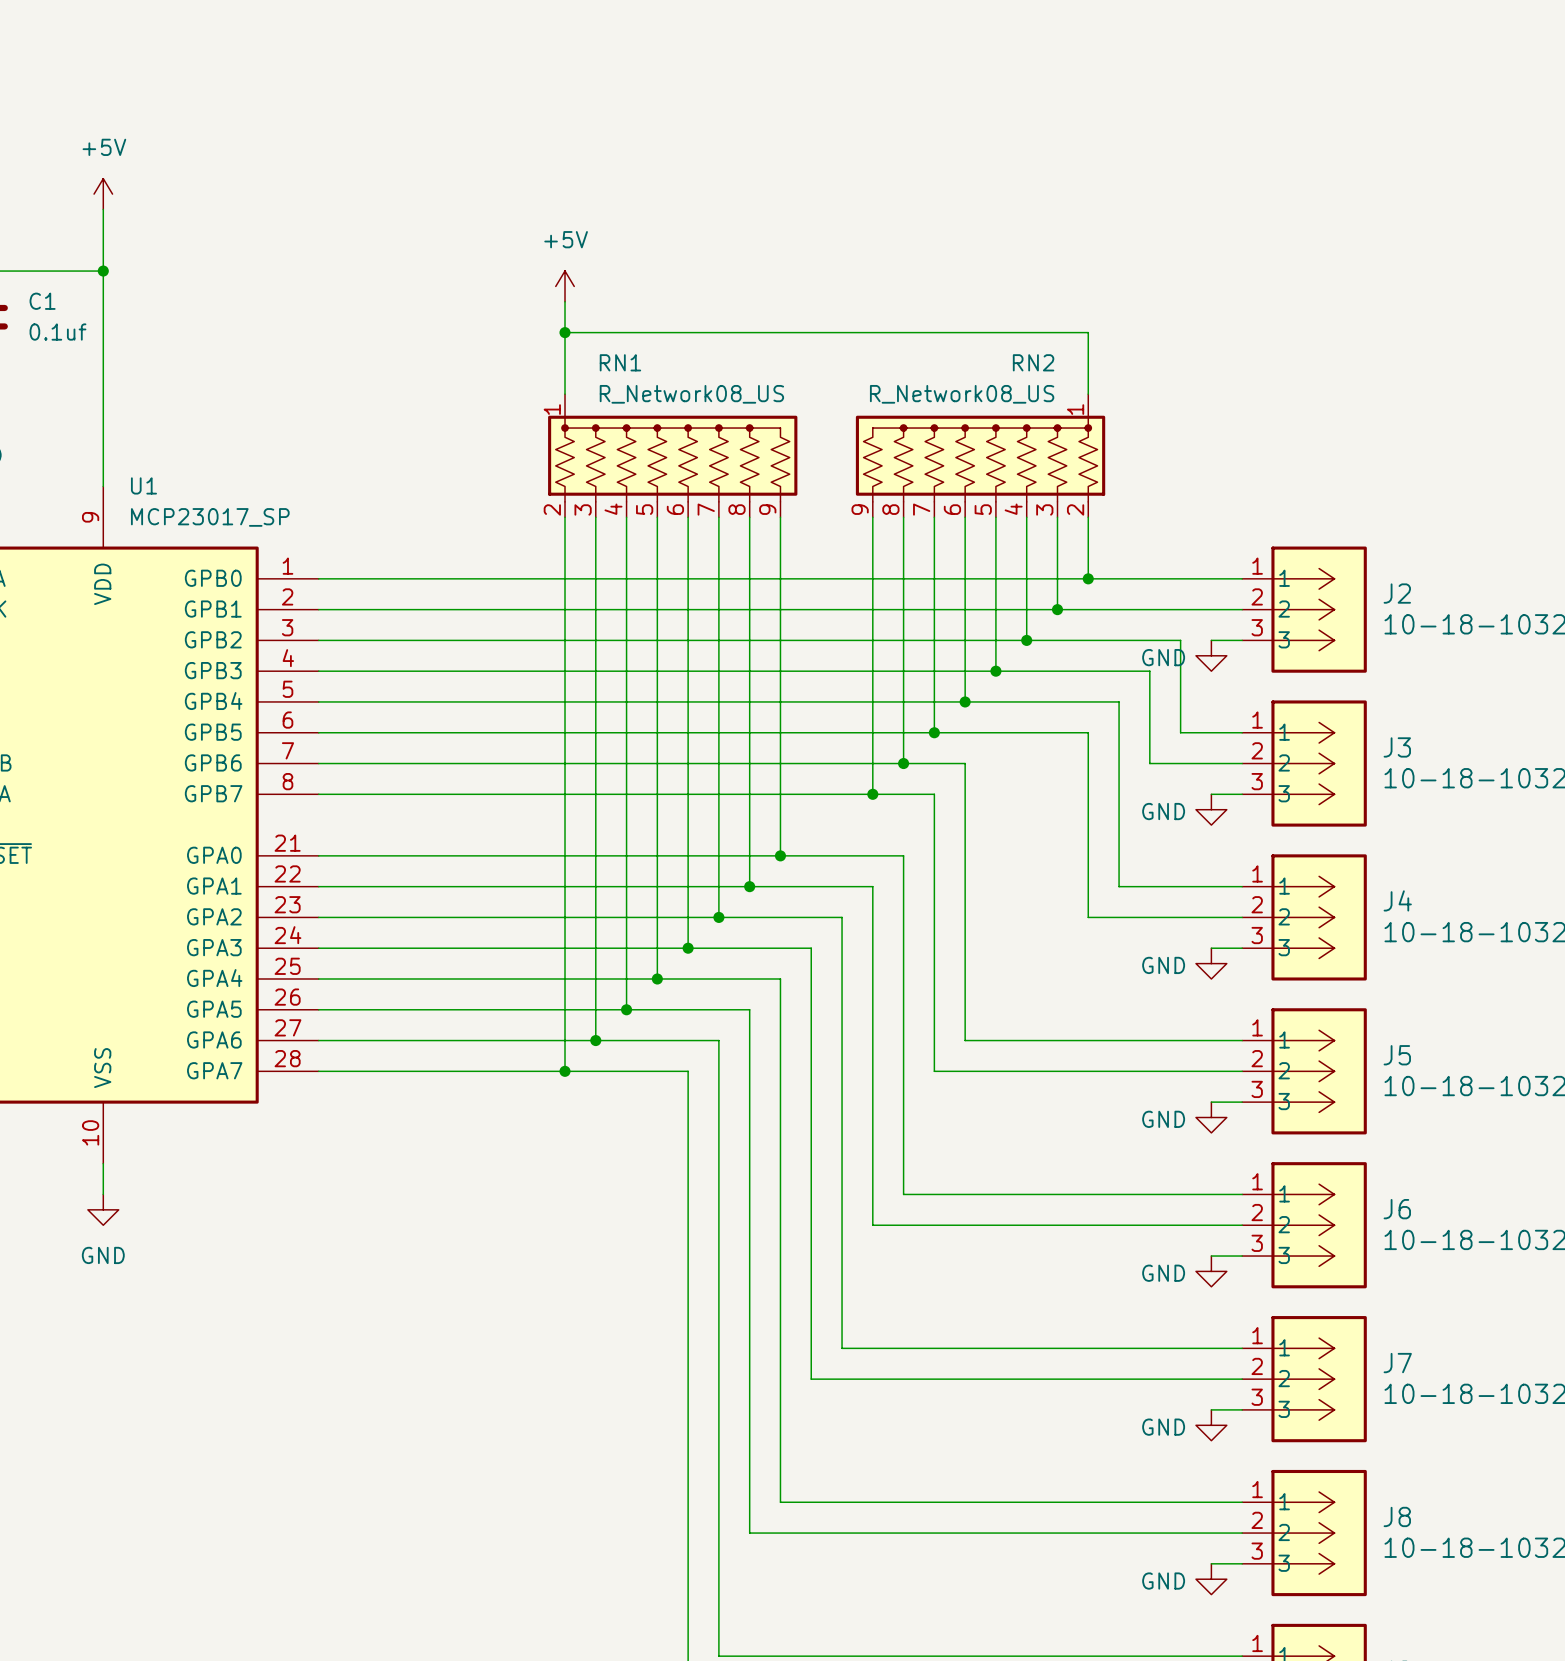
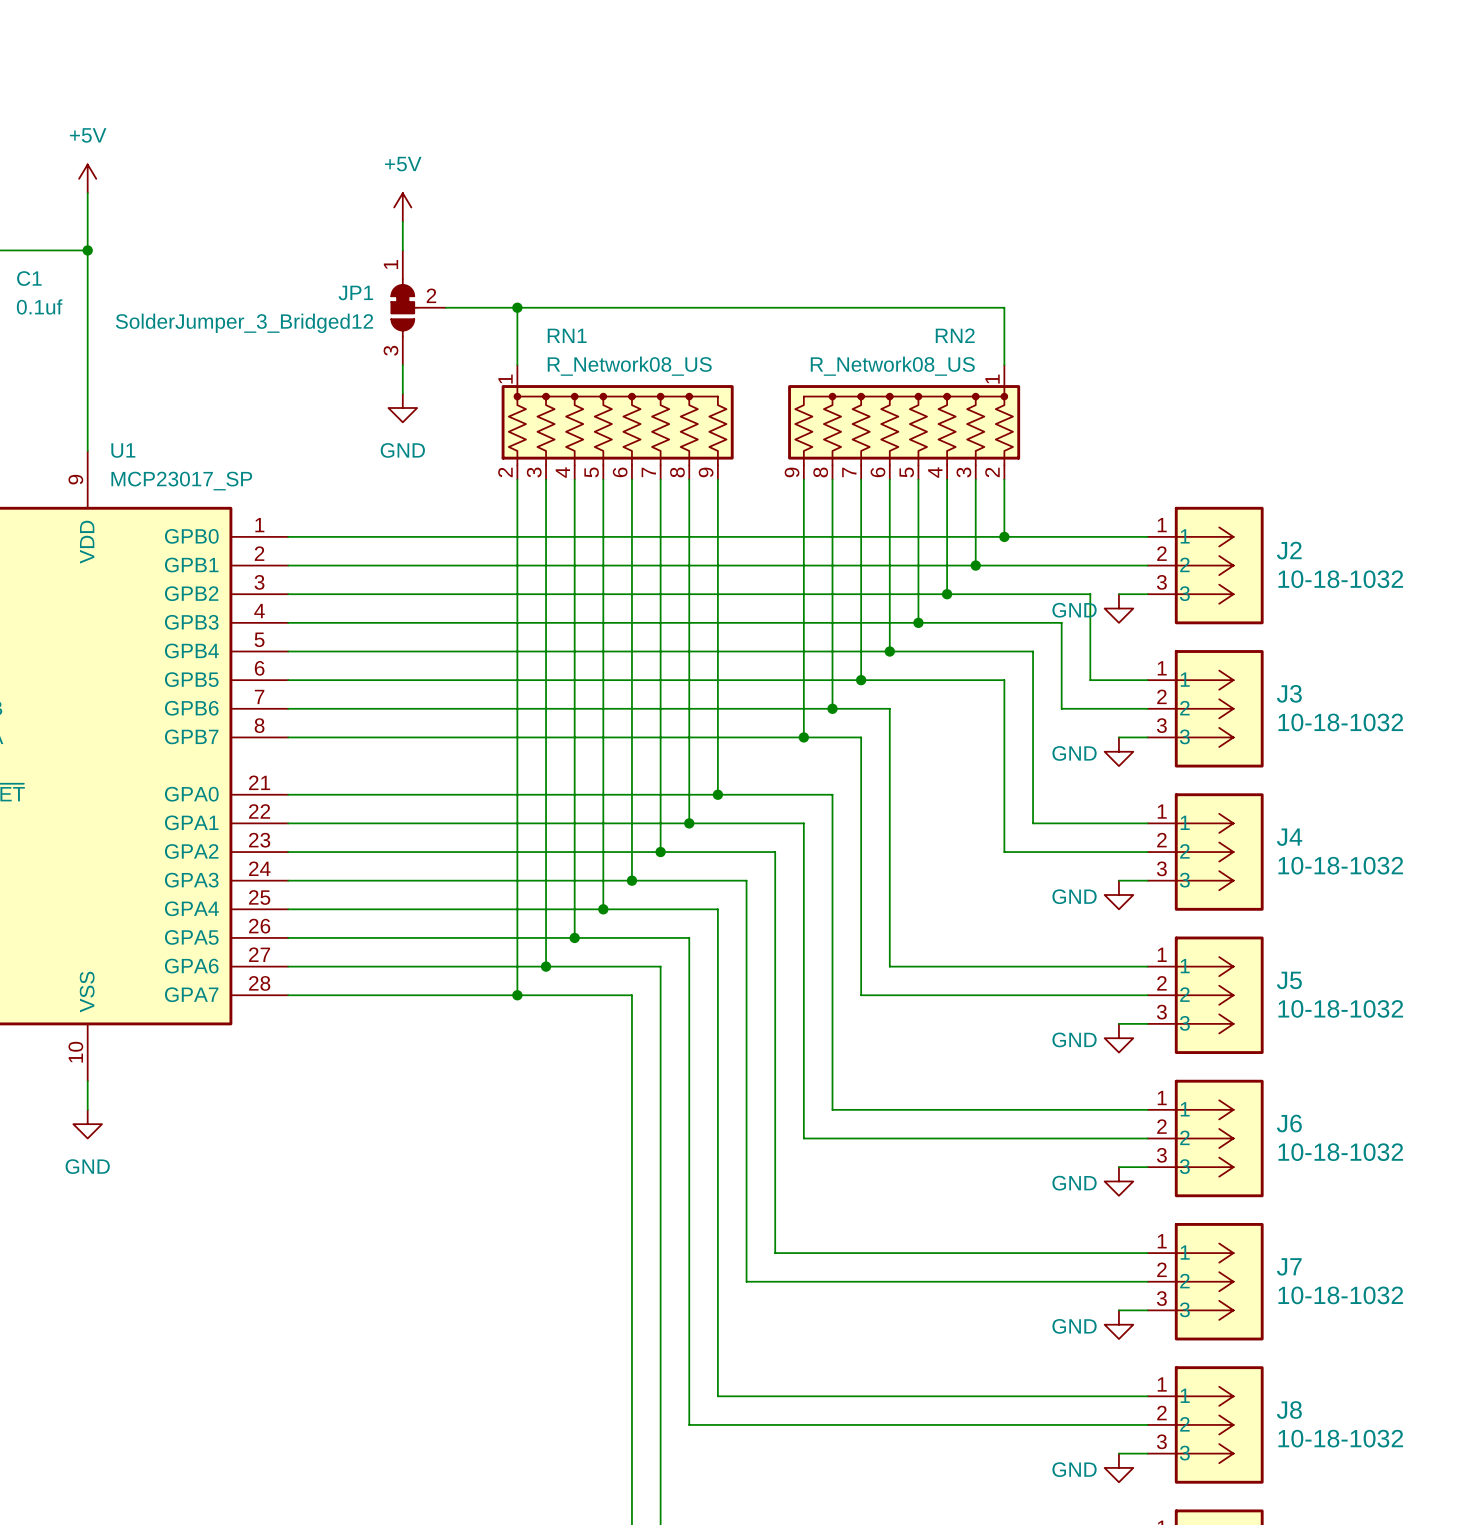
wire: none -> (402, 221) (402, 250)
power symbol position: +5V (565, 286) -> +5V (402, 207)
wire: (565, 301) (565, 332) -> (445, 307) (517, 307)
JP1: none -> SolderJumper_3_Bridged12 (418, 307)
wire: none -> (402, 365) (402, 393)
power symbol: none -> GND (402, 408)

